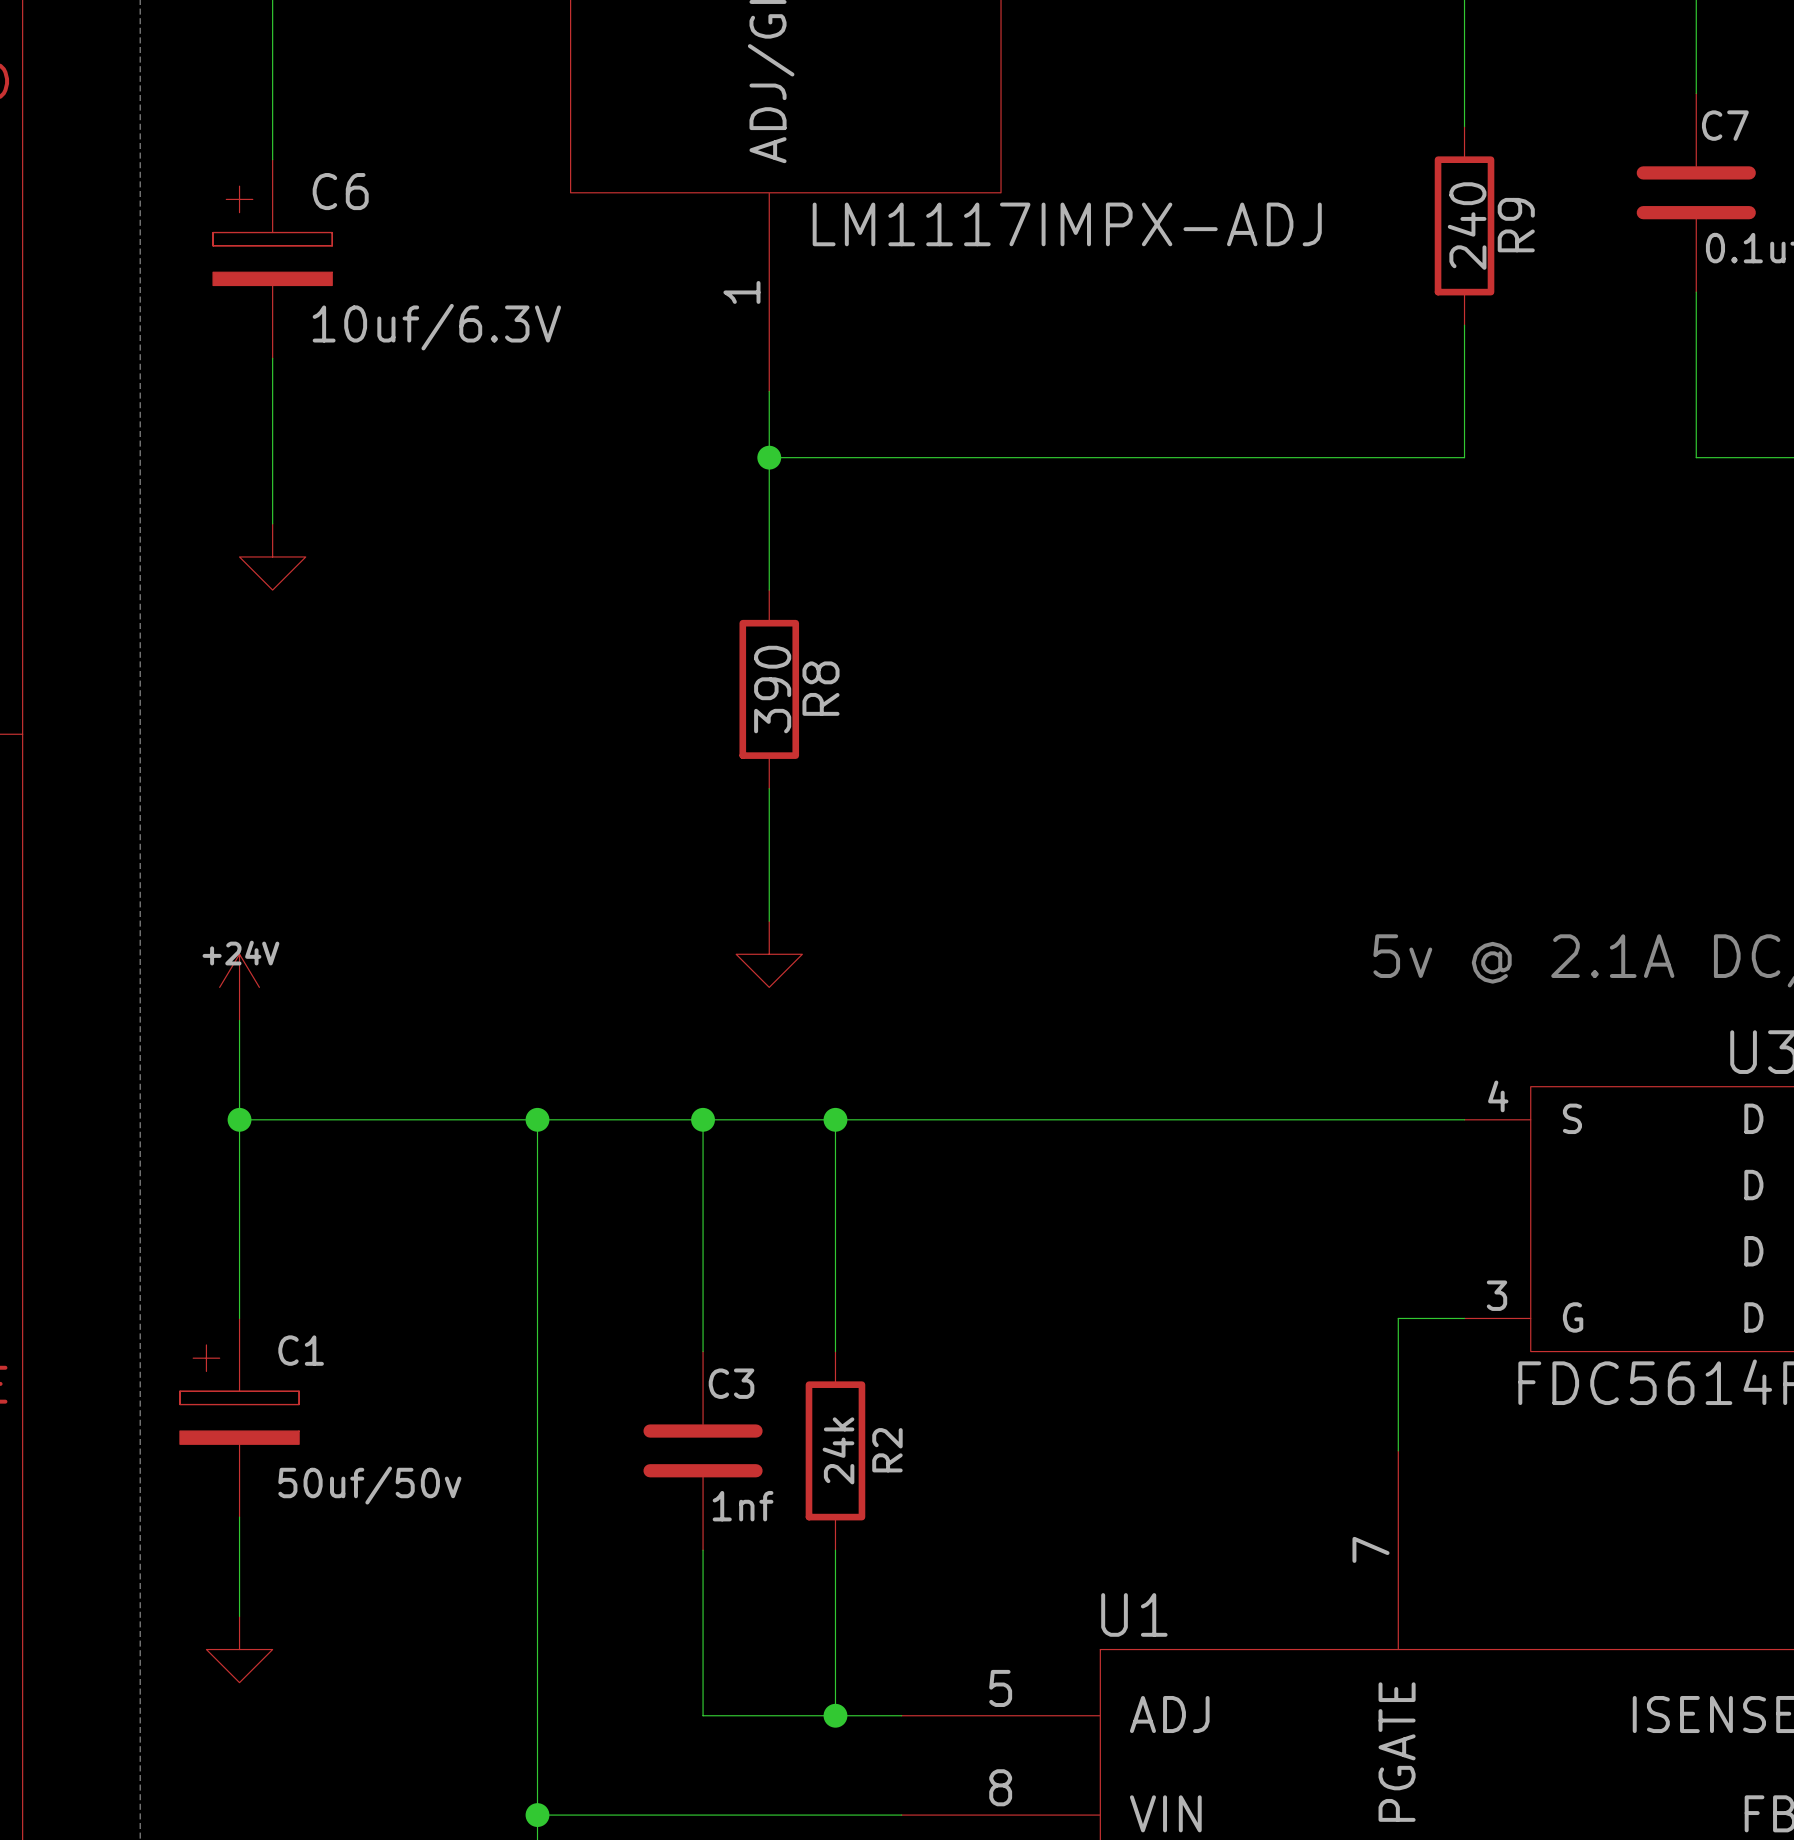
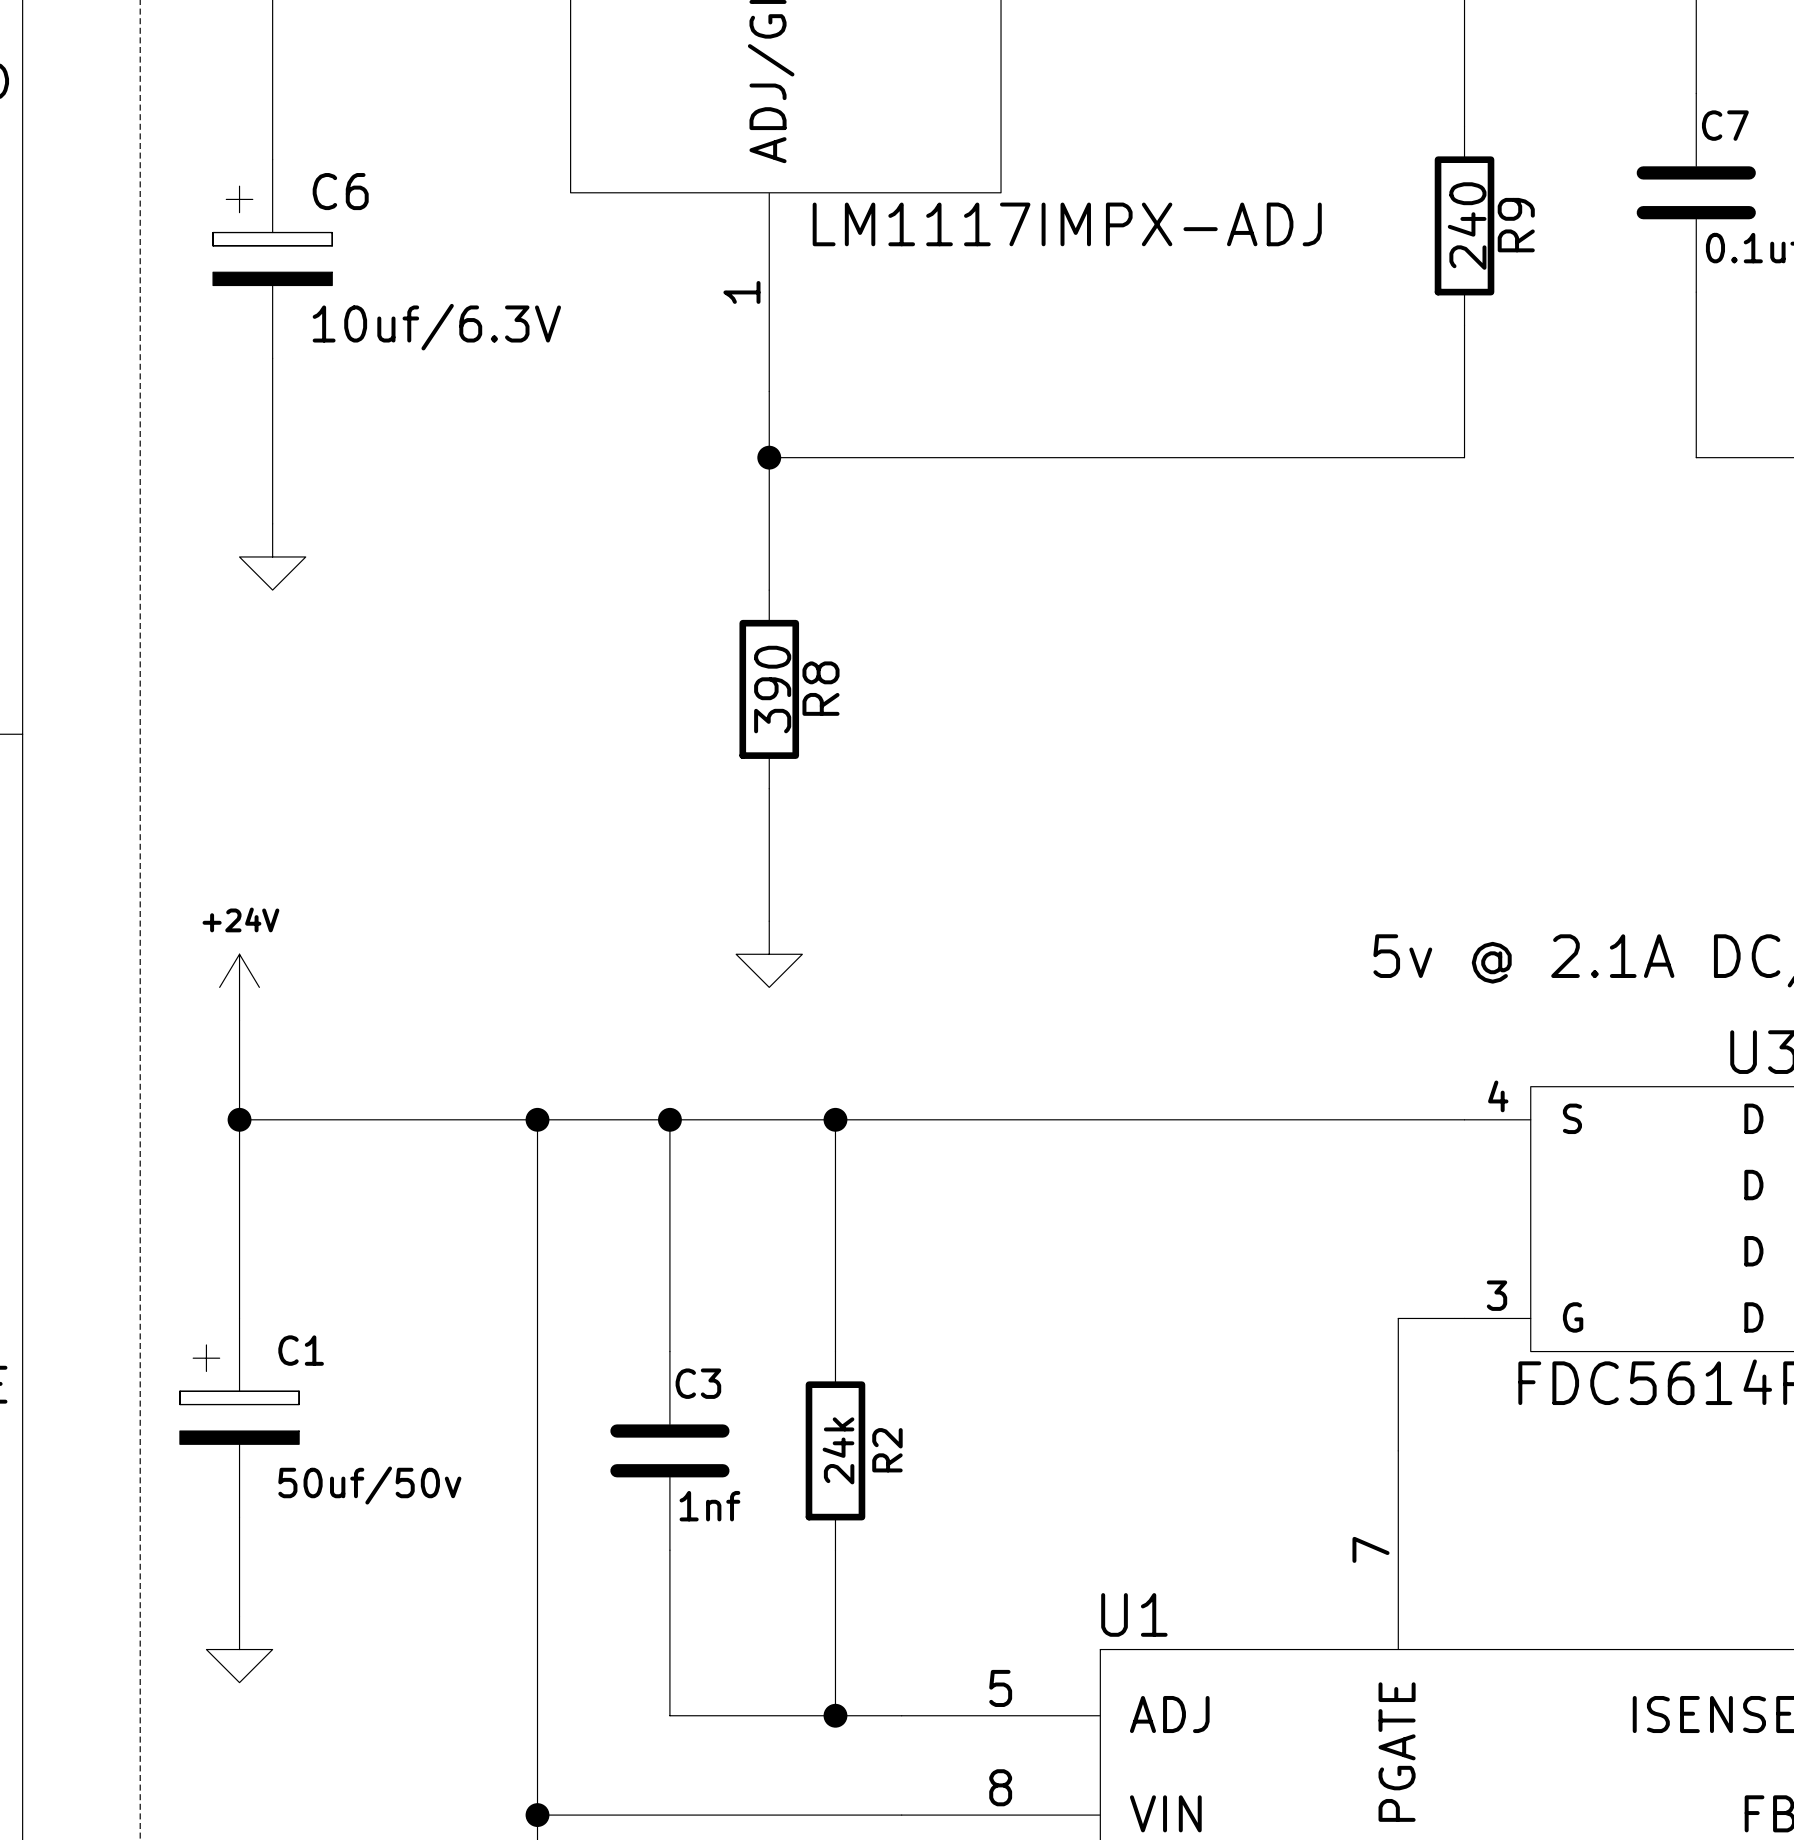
power symbol text position: +24V (240, 953) -> +24V (240, 919)
wire: (703, 1119) (703, 1351) -> (669, 1119) (669, 1351)
junction position: (703, 1119) -> (669, 1119)
C3 position: (703, 1450) -> (669, 1450)
wire: (703, 1550) (703, 1715) -> (669, 1550) (669, 1715) (703, 1715)

